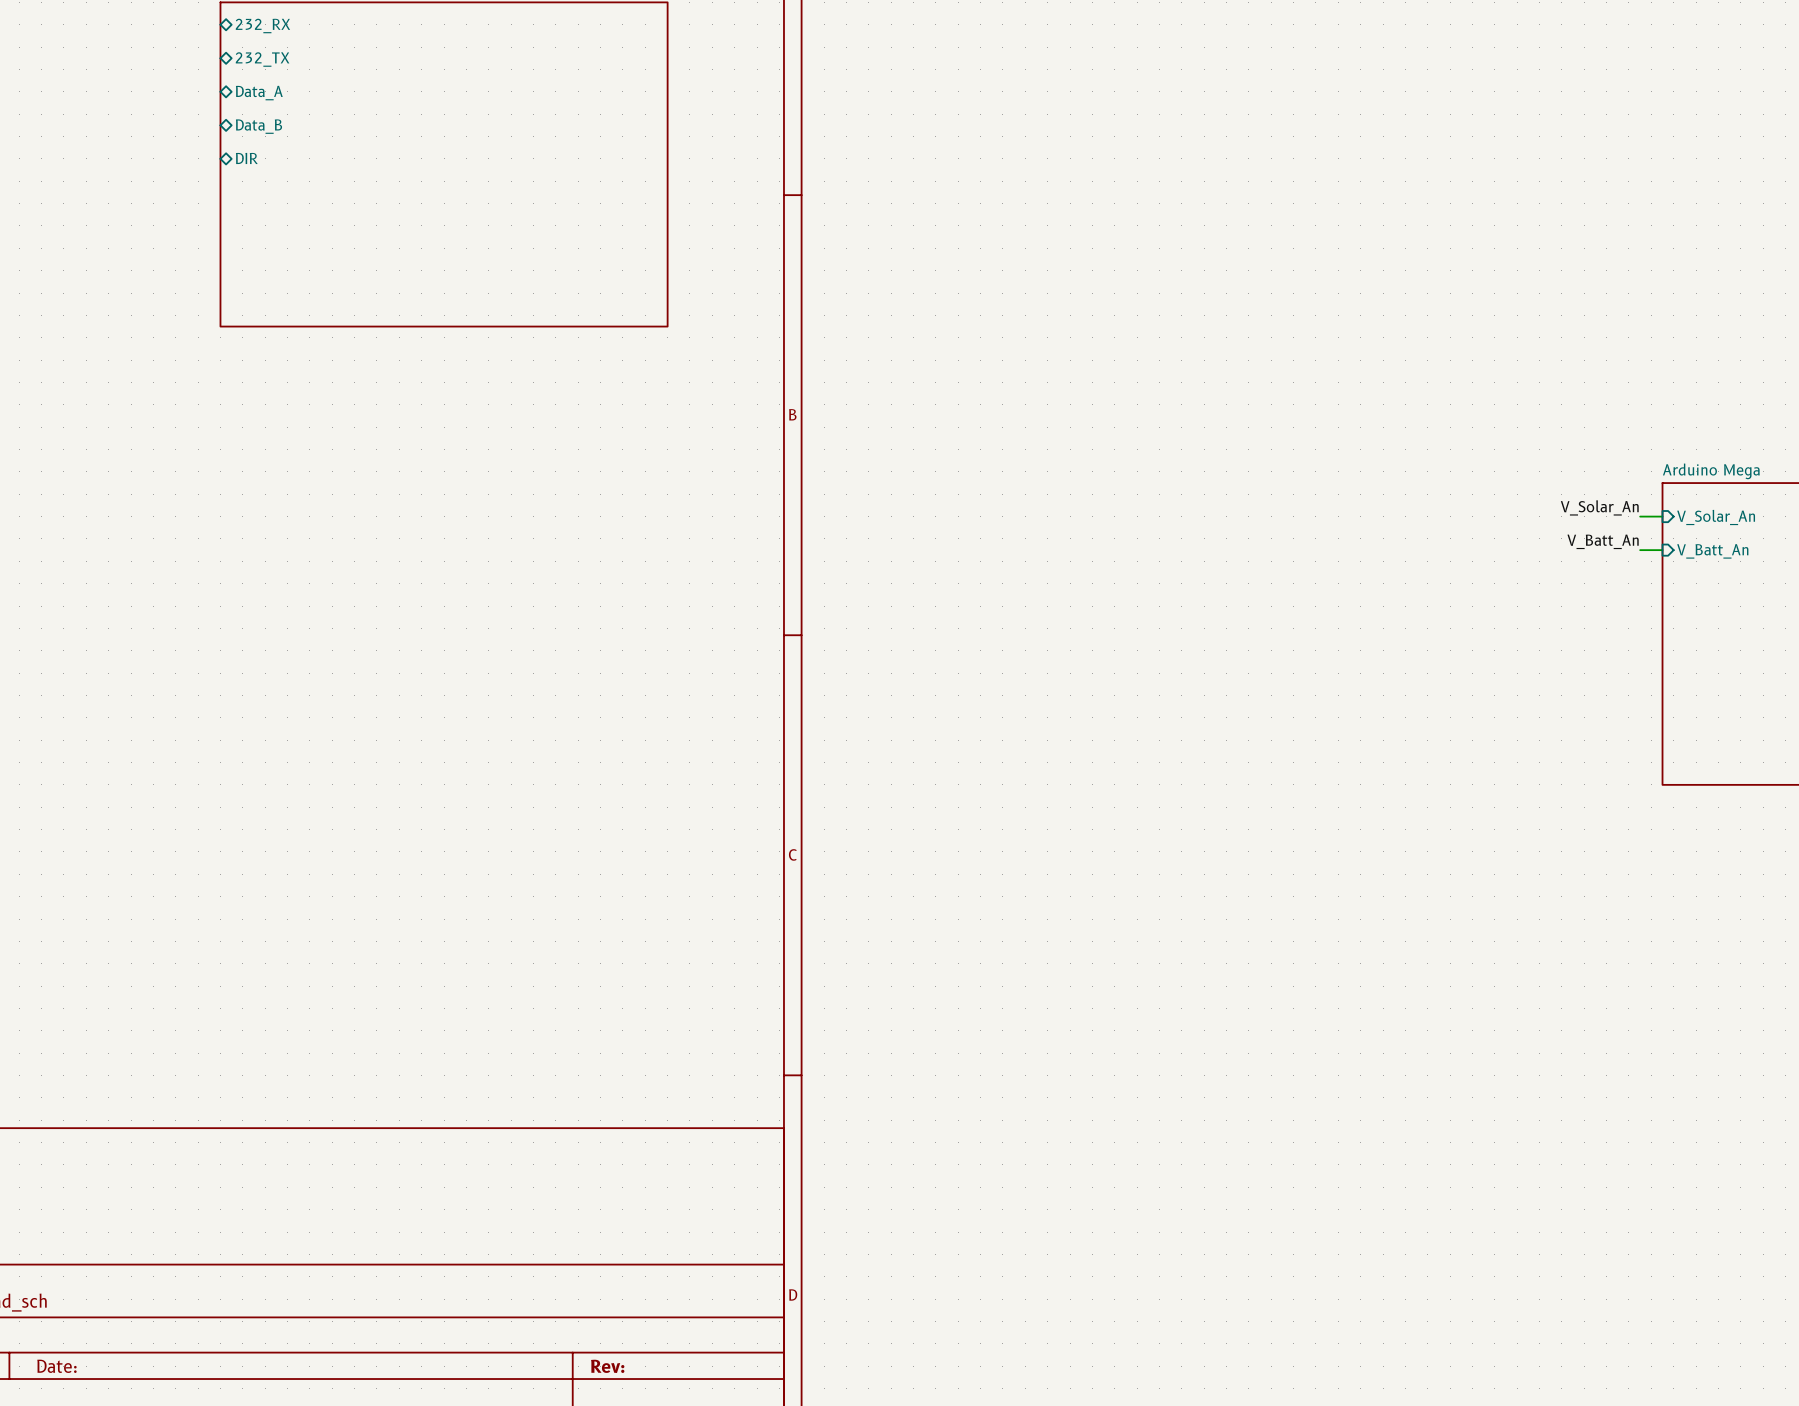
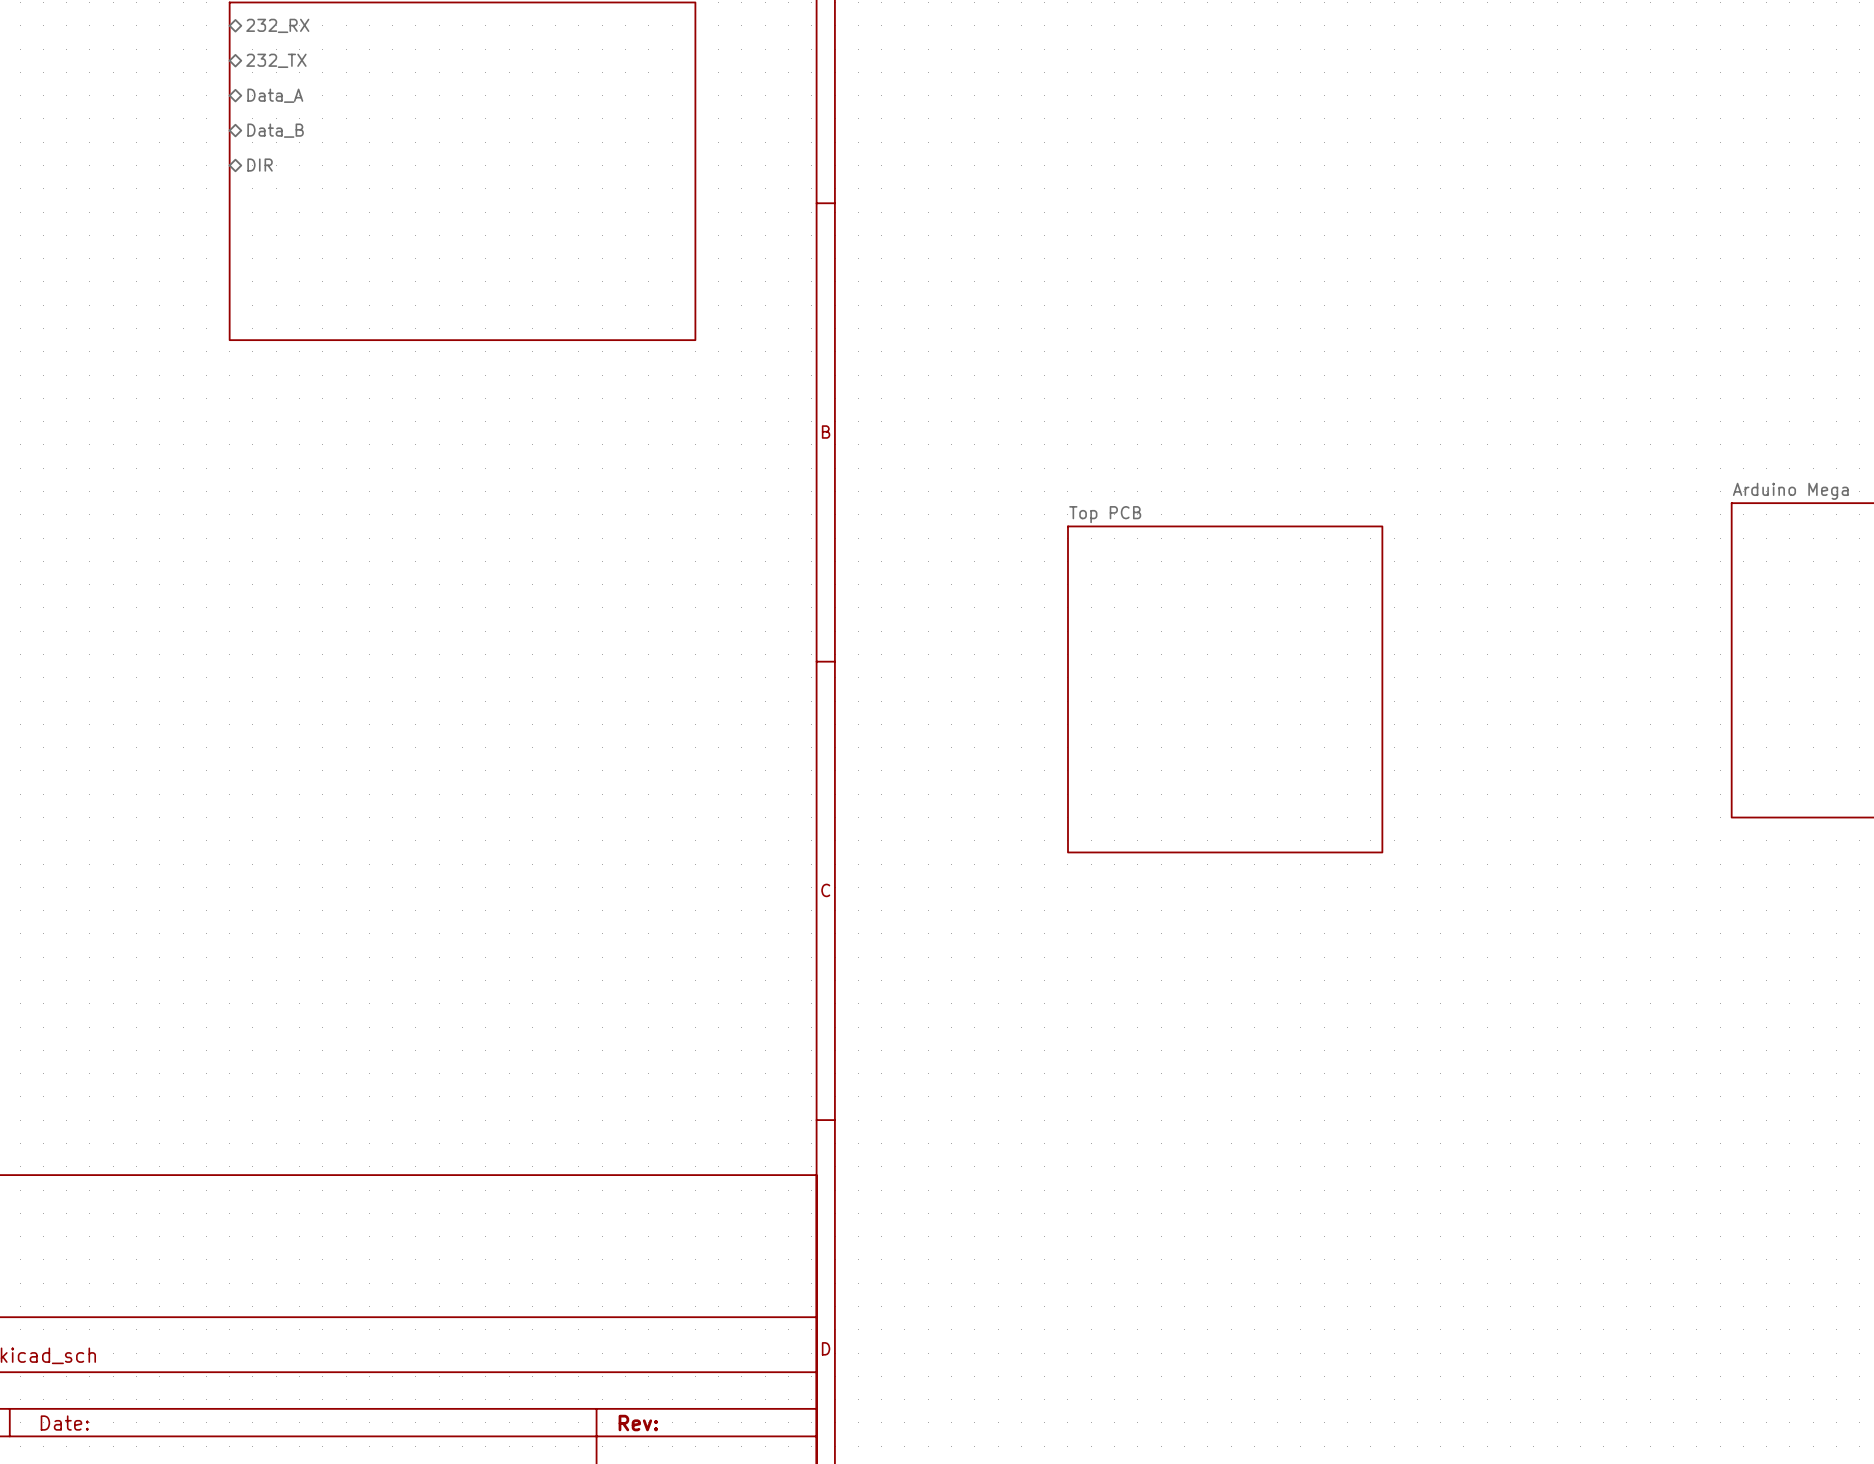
label: V_Solar_An (1599, 507) -> none
wire: (1640, 516) (1662, 516) -> none
sheet pin: V_Solar_An (1716, 517) -> none
label: V_Batt_An (1603, 541) -> none
wire: (1640, 550) (1662, 550) -> none
sheet pin: V_Batt_An (1712, 551) -> none
sheet Top PCB: none -> (1225, 689)

